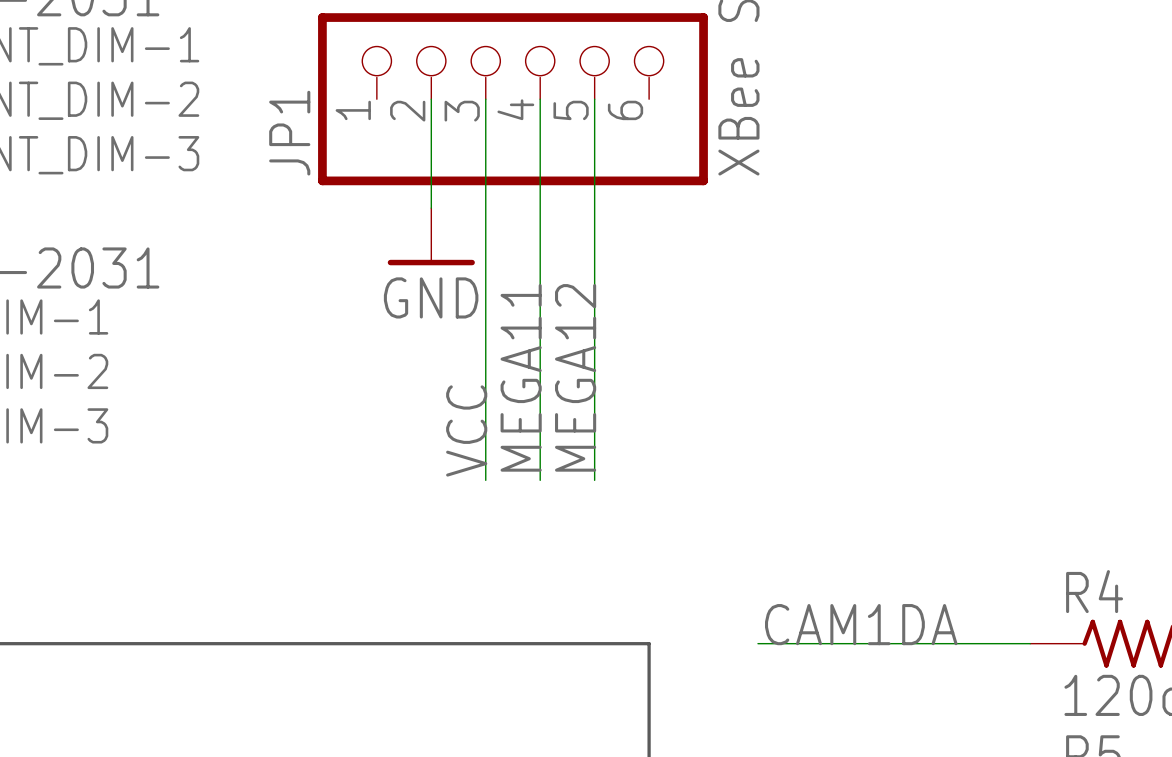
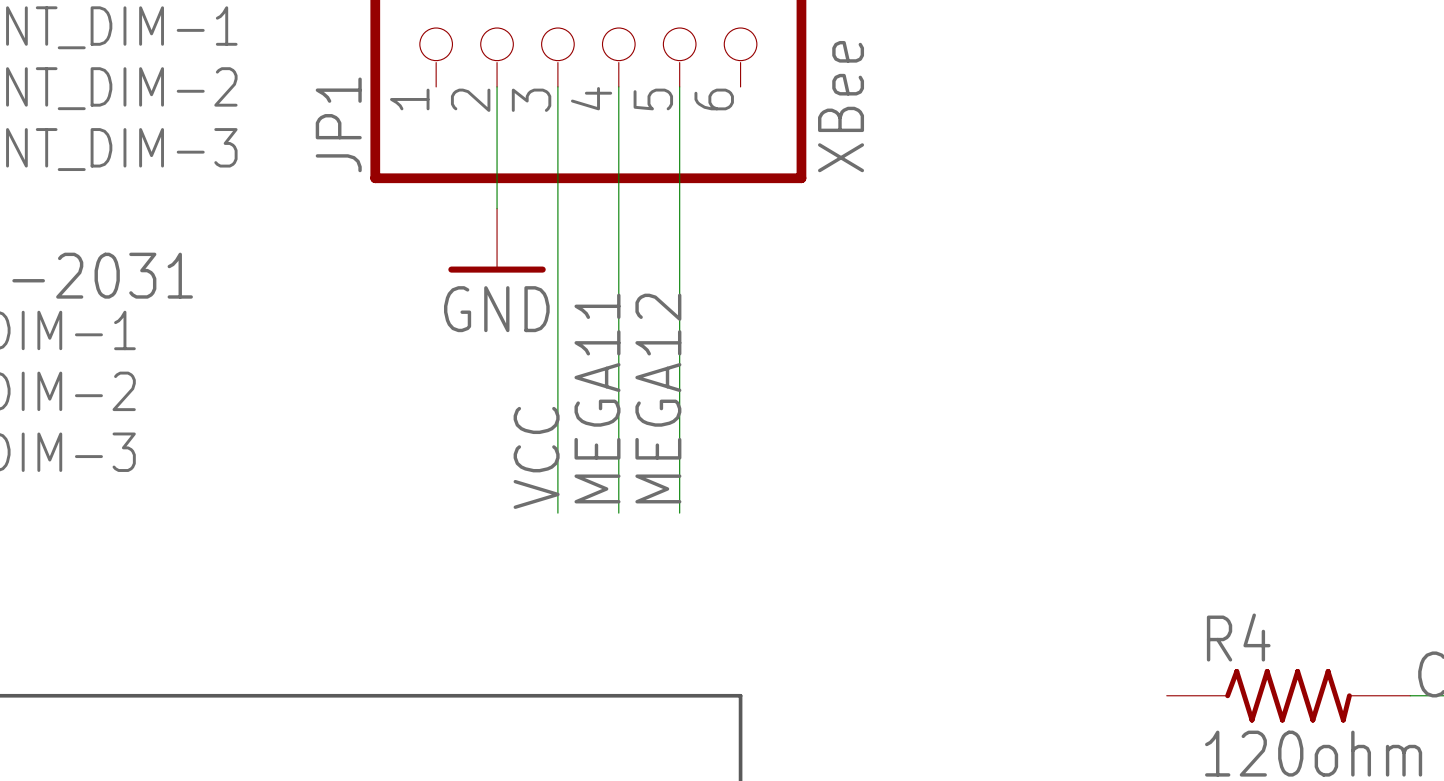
label: CAM1DA (861, 624) -> none
wire: (757, 643) (1030, 643) -> none

